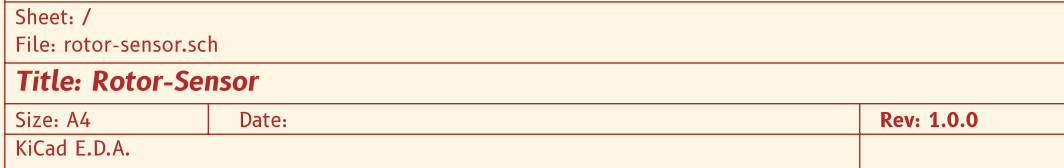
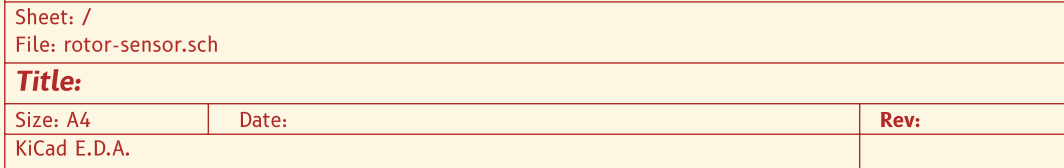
title block: Title: Rotor-Sensor (138, 79) -> Title: (48, 79)
title block: Rev: 1.0.0 (929, 119) -> Rev: (900, 119)

